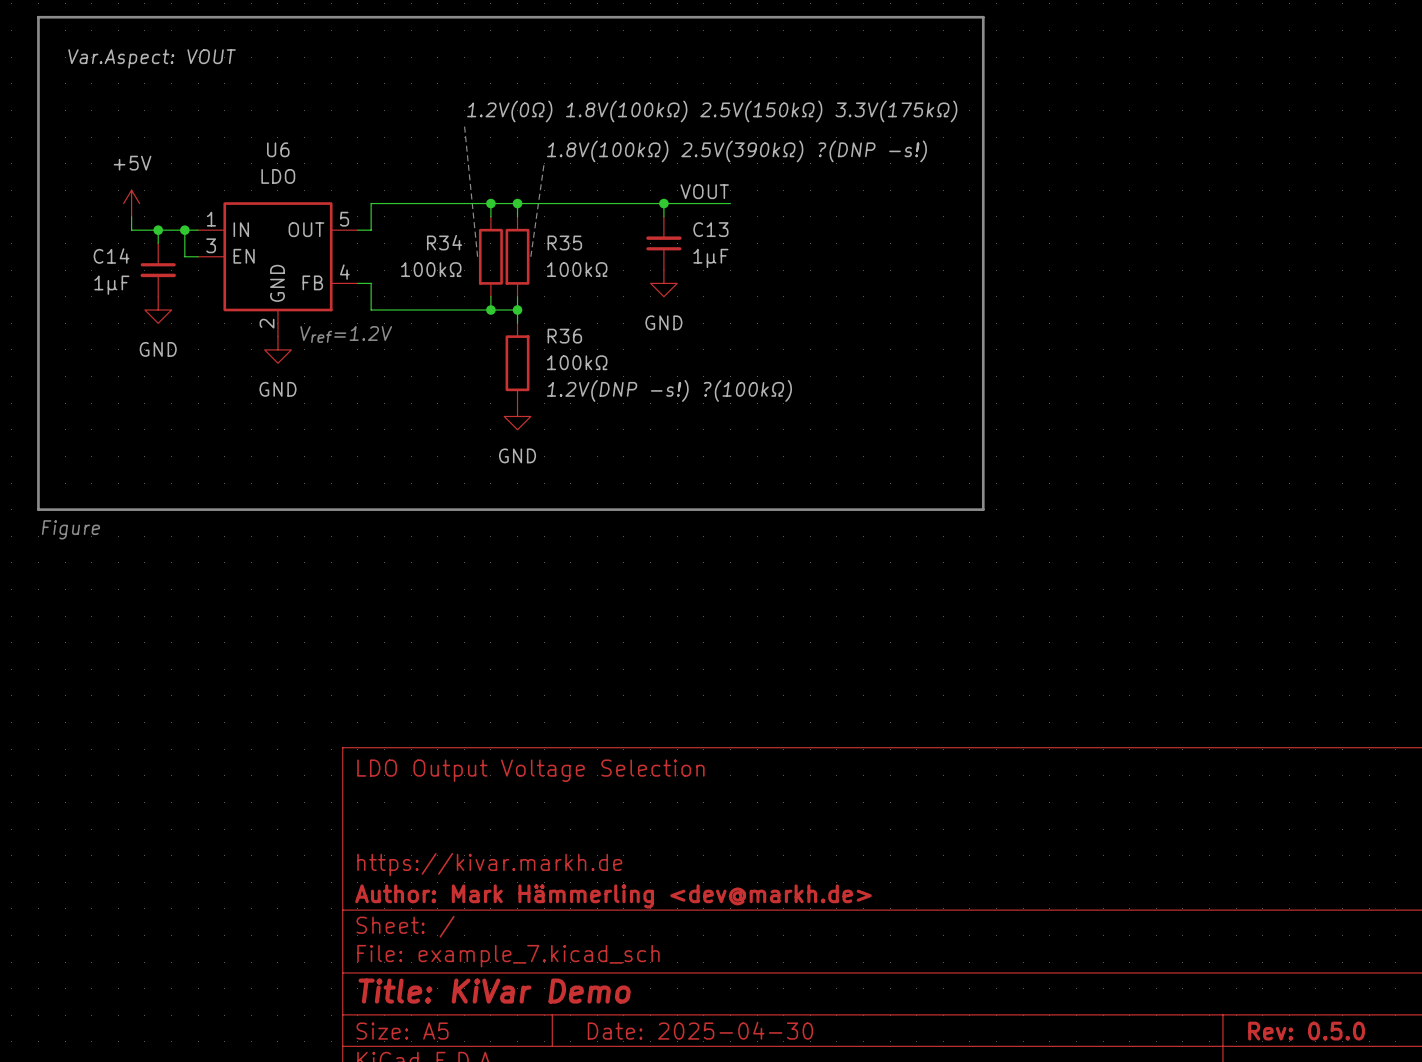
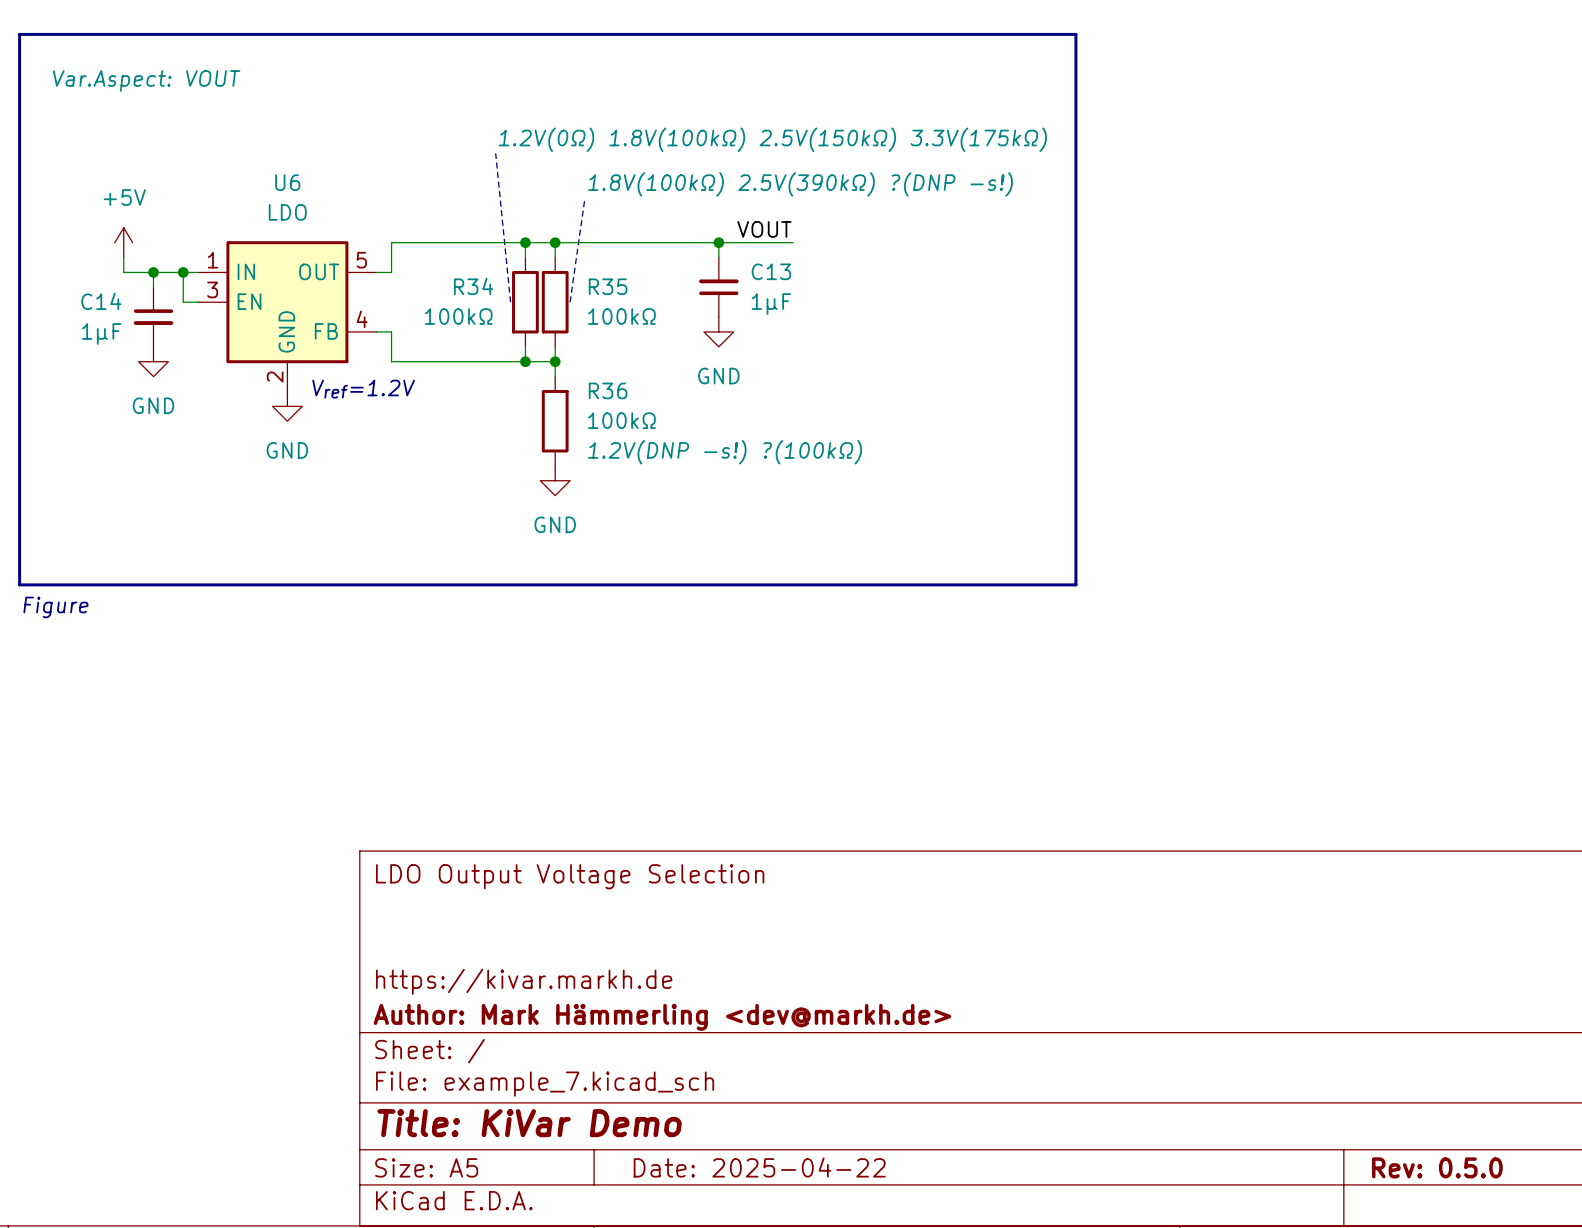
title block: Date: 2025-04-30 (700, 1030) -> Date: 2025-04-22 (759, 1167)

